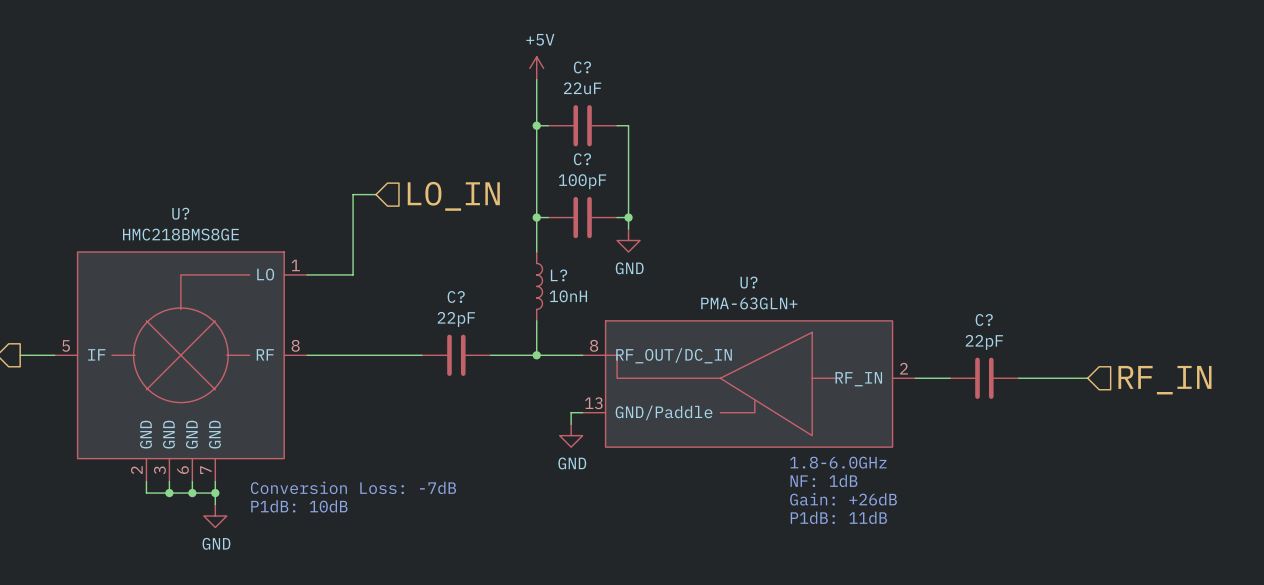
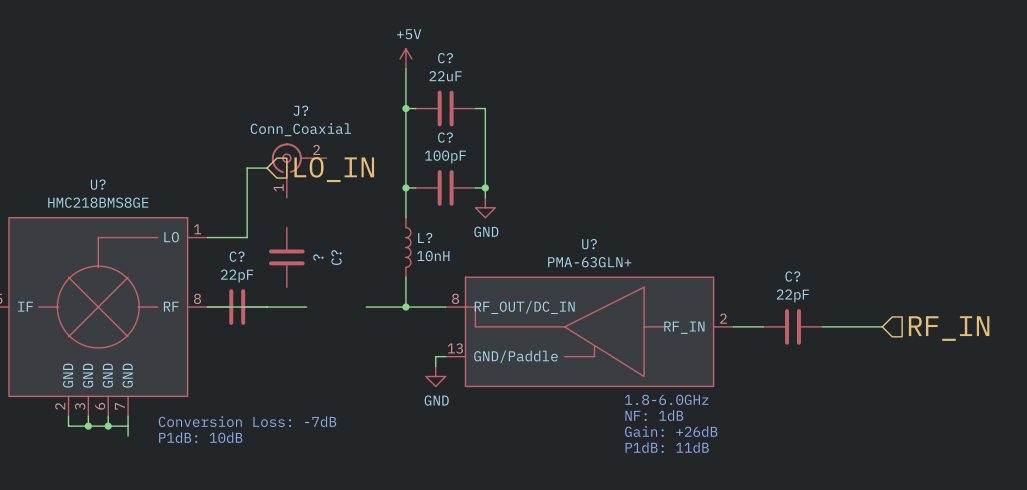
J?: none -> Conn_Coaxial (299, 170)
C?: none -> ? (286, 257)
C? position: (456, 355) -> (237, 307)
junction: (215, 493) -> none
power symbol: GND (215, 516) -> none

